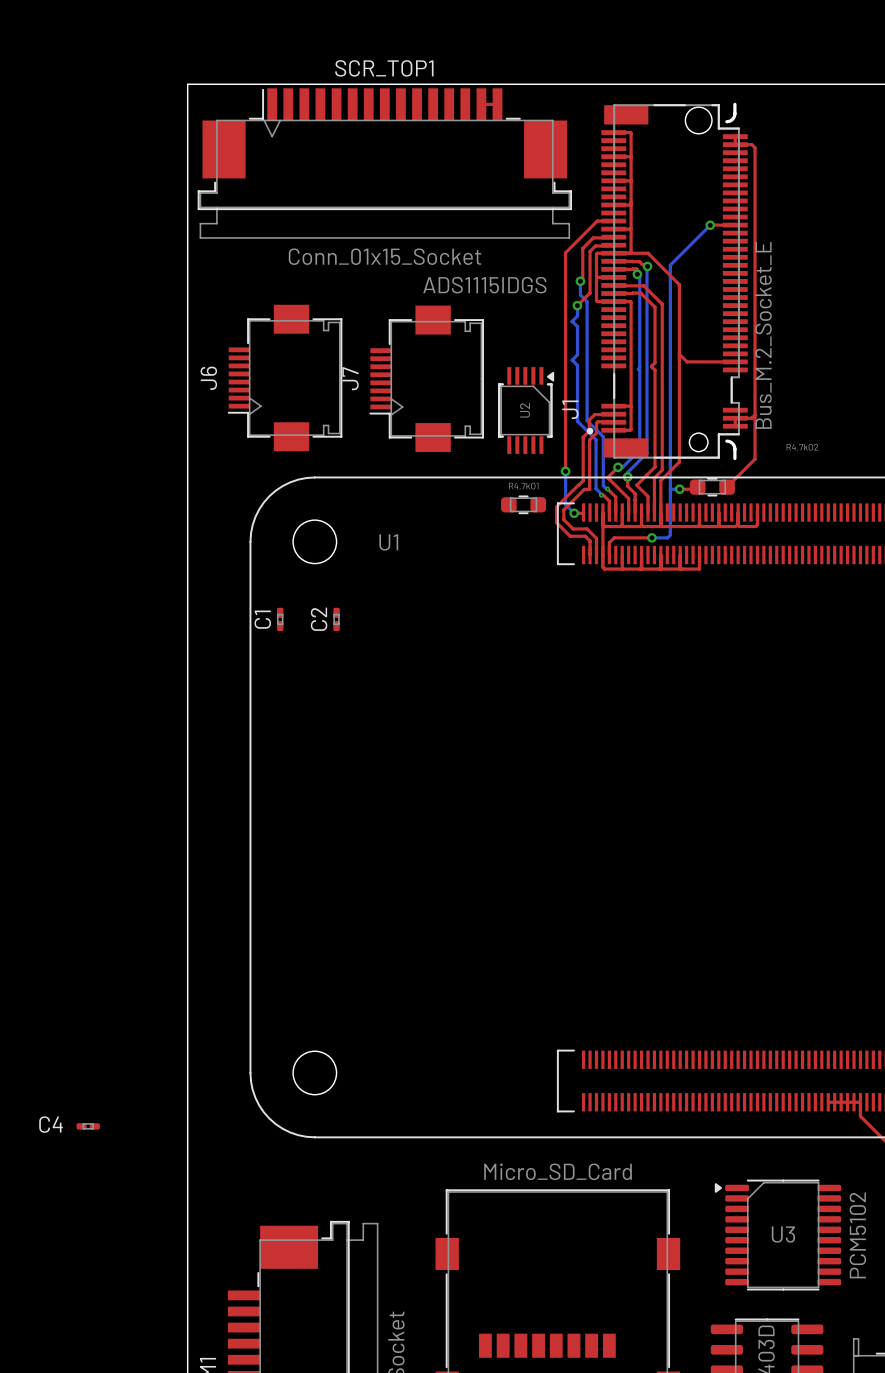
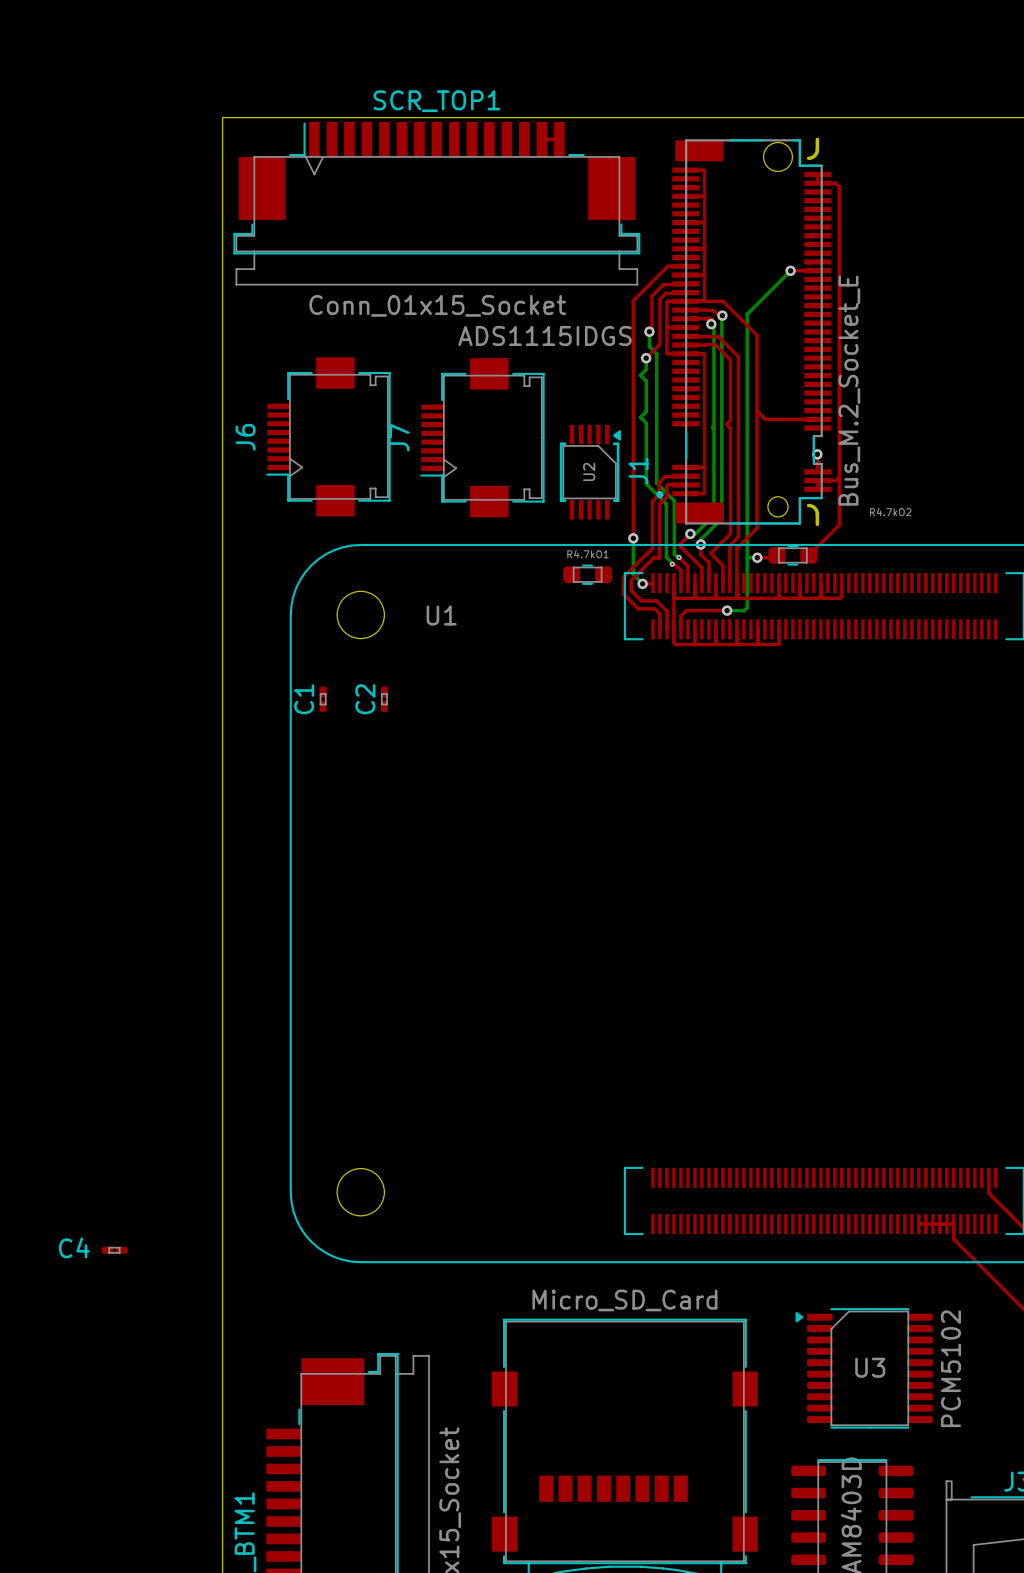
top track: none -> (817, 454) (817, 471)
via: none -> (817, 454)

